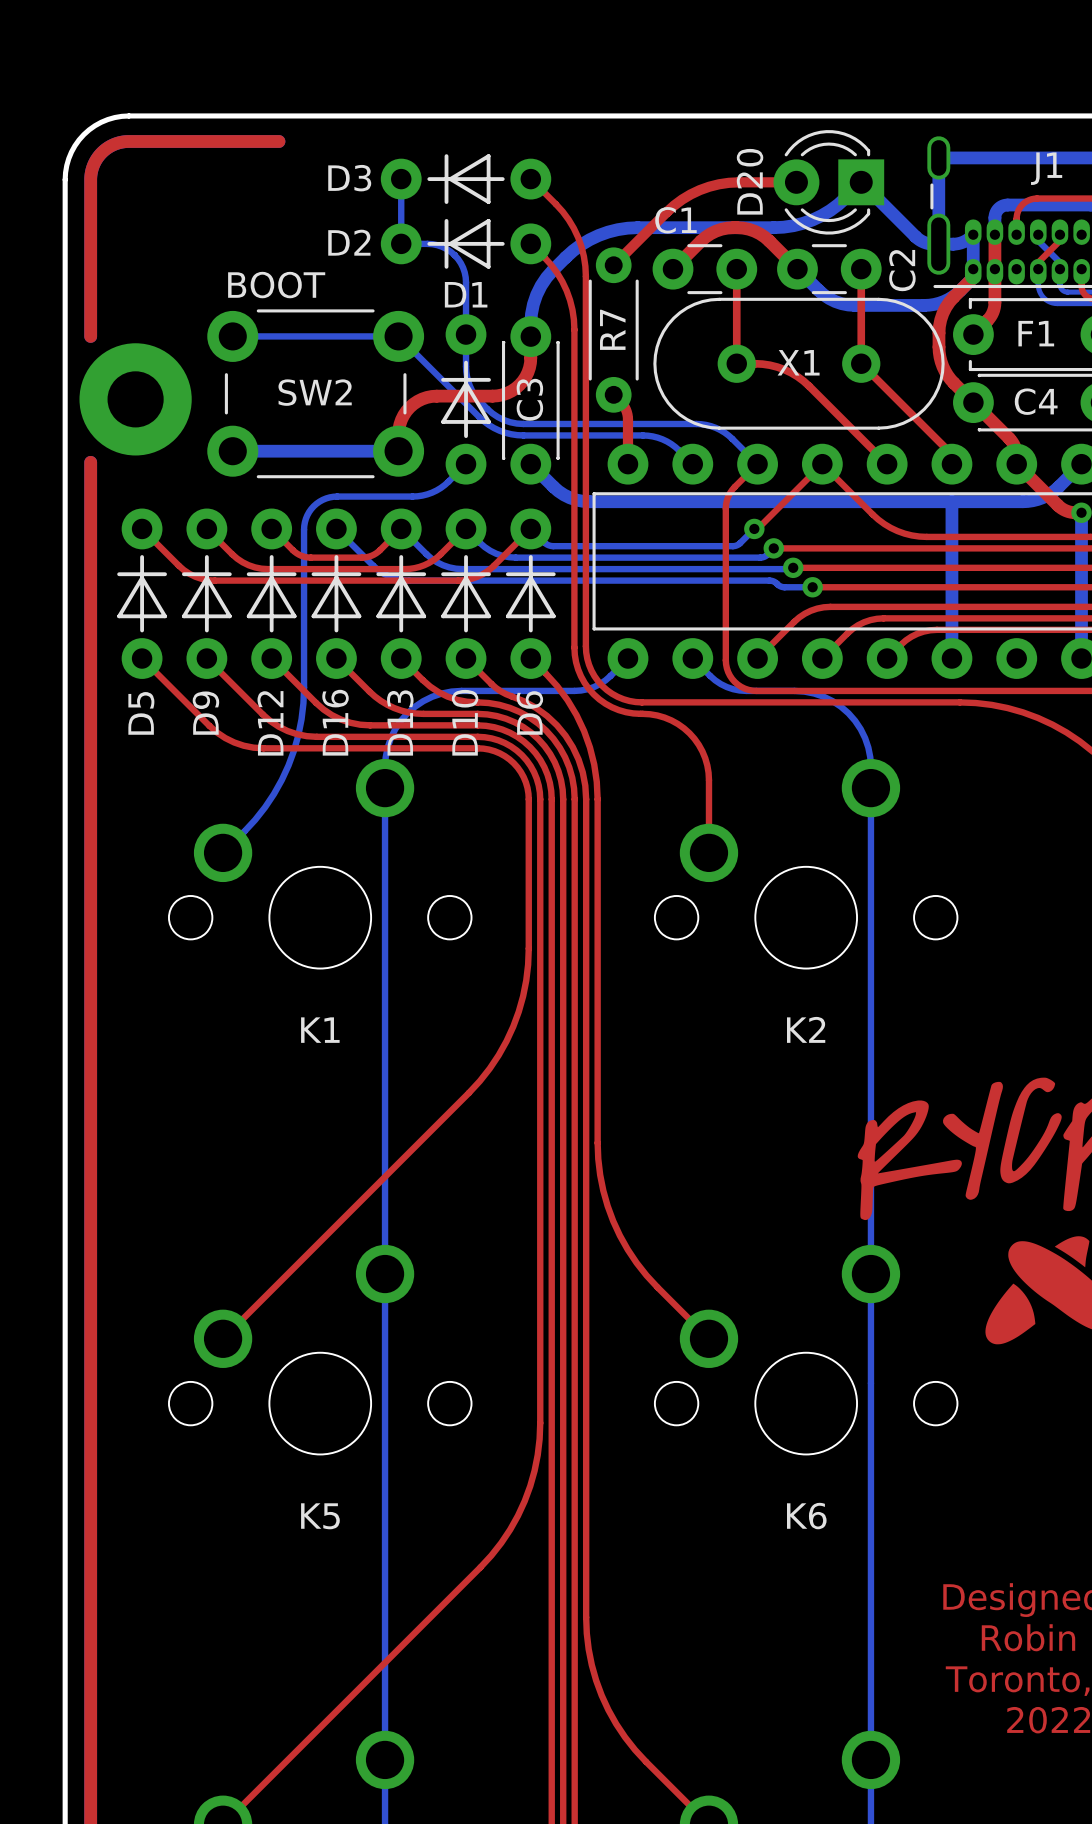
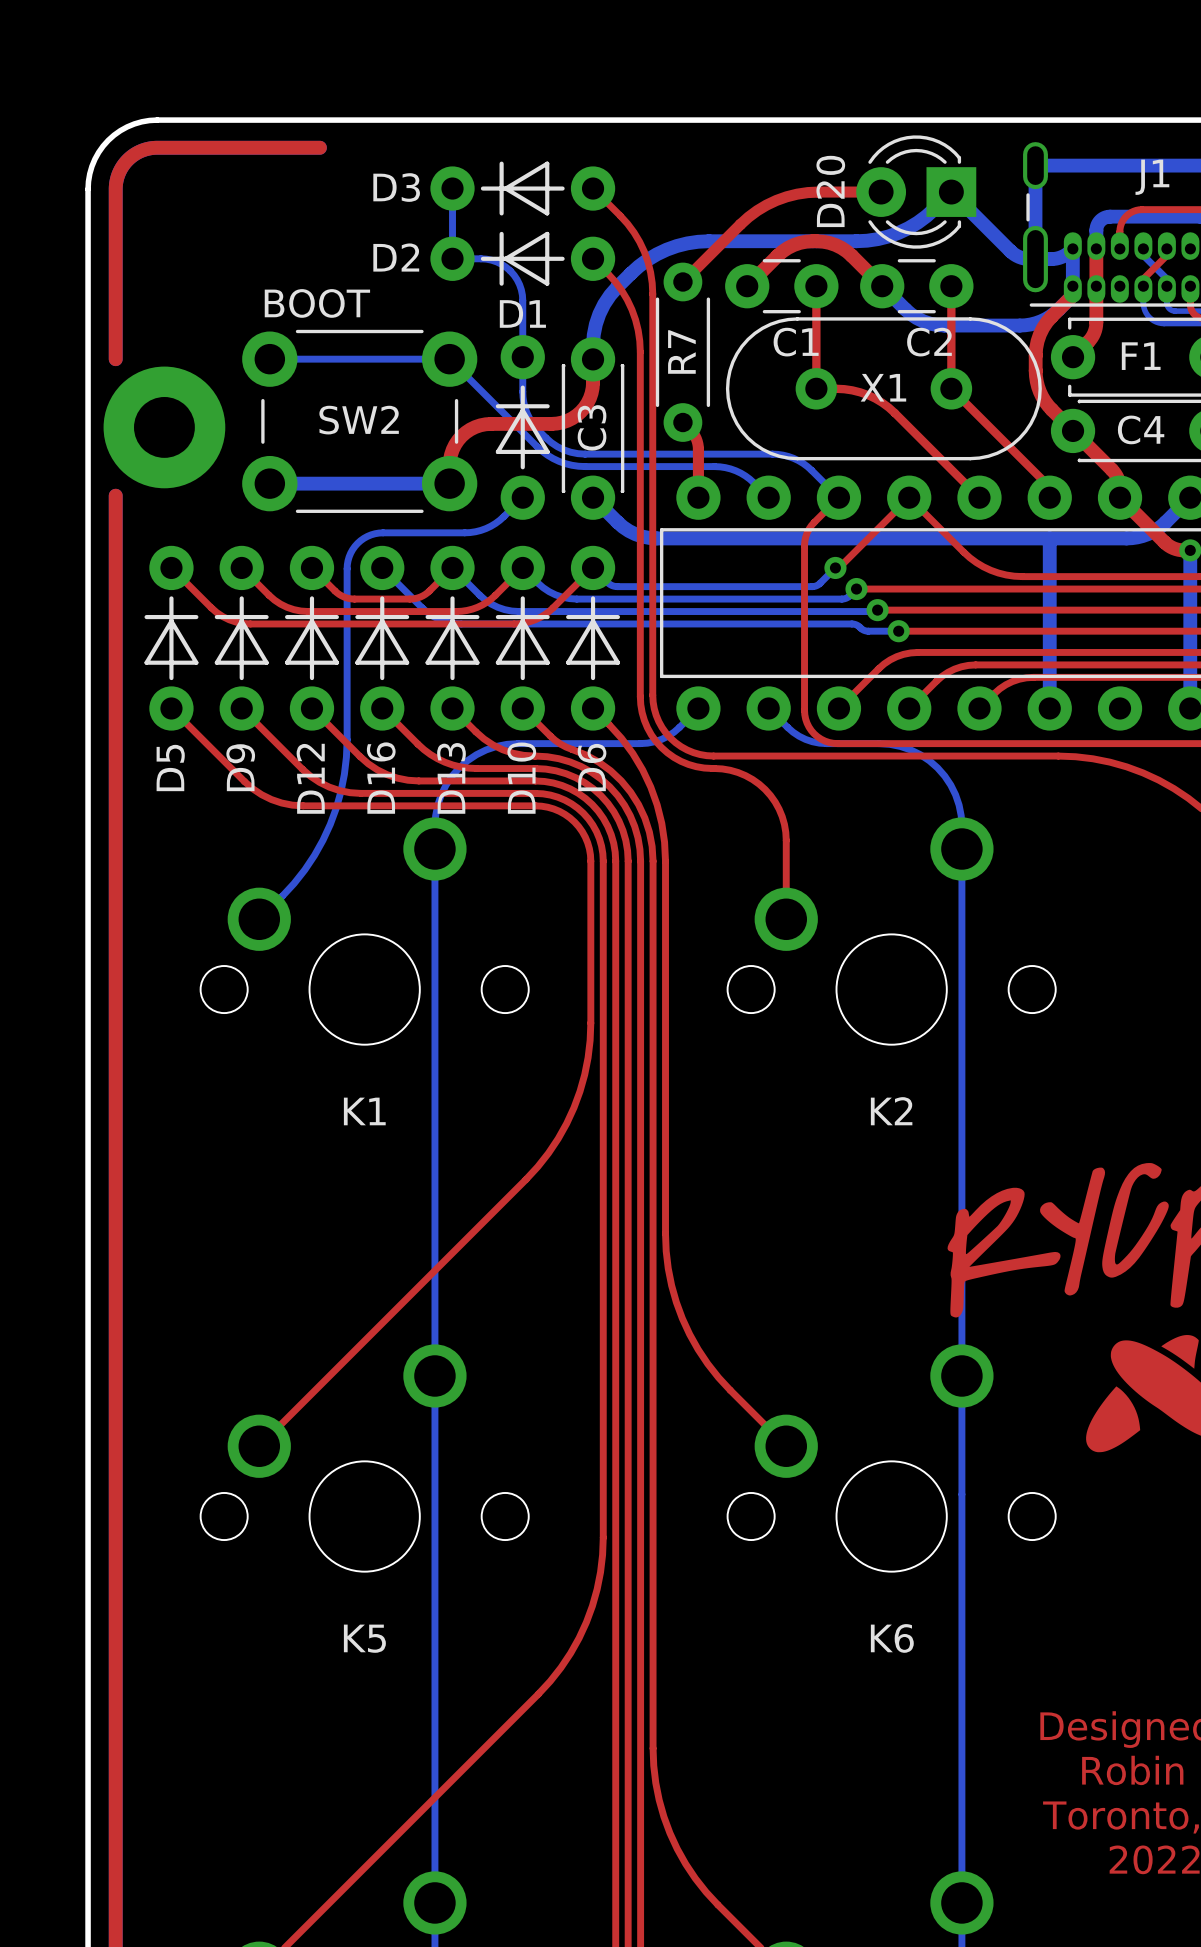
C1 name position: C1 (675, 220) -> C1 (796, 342)
C2 name rotation: 0° (902, 270) -> 90° clockwise (929, 342)
C2 name position: C2 (902, 270) -> C2 (929, 342)

